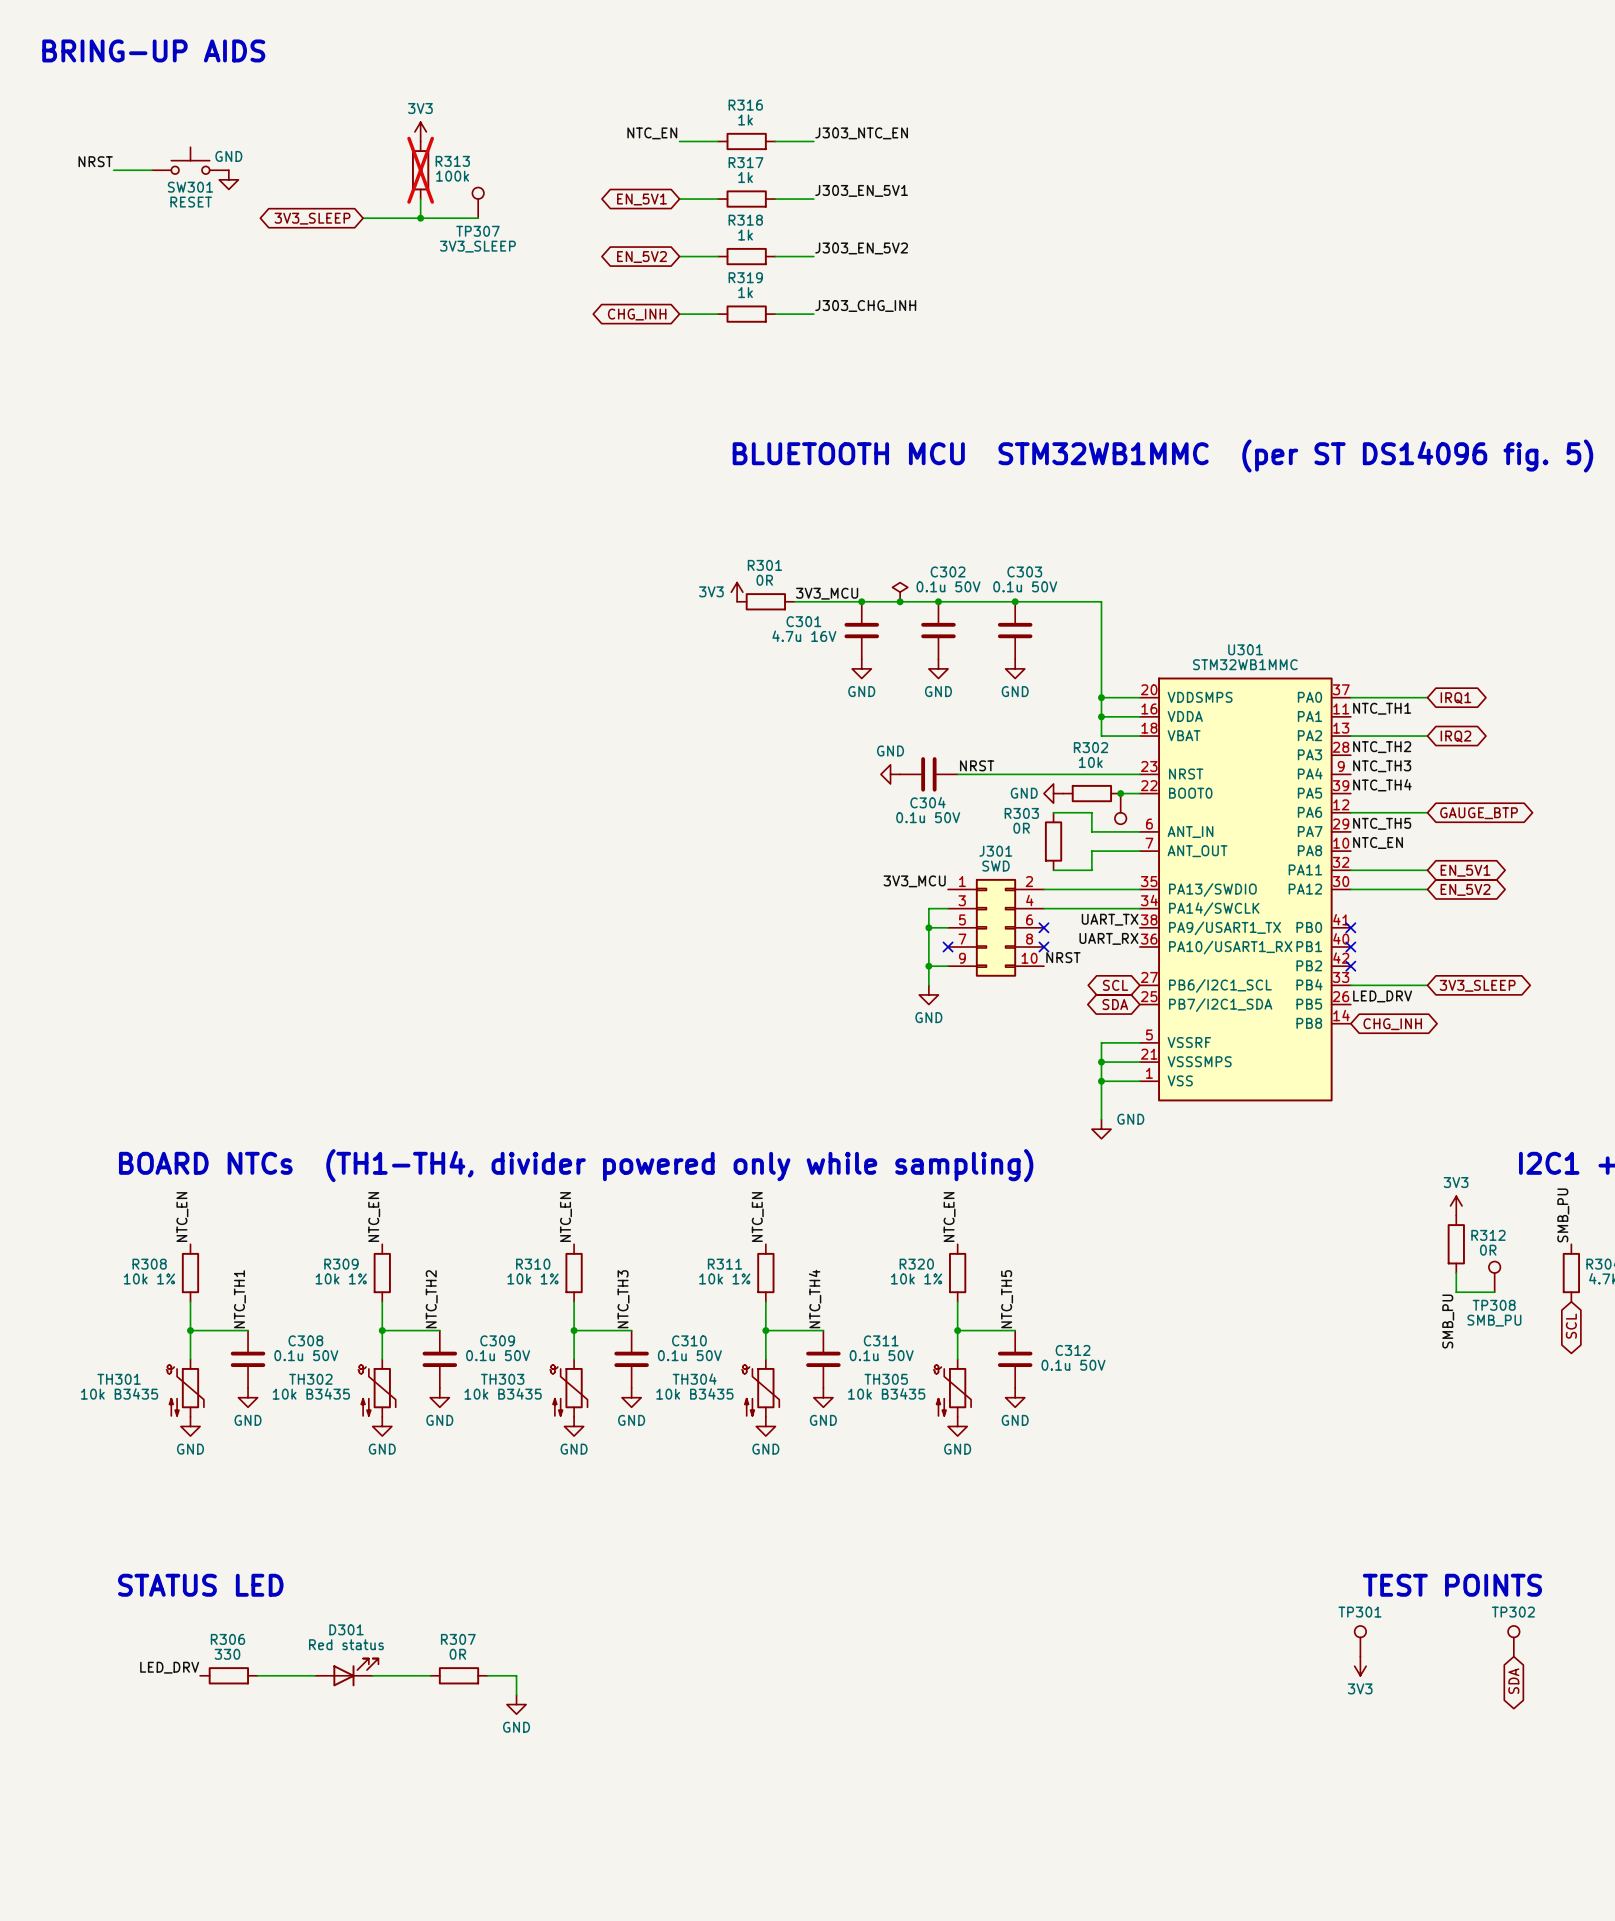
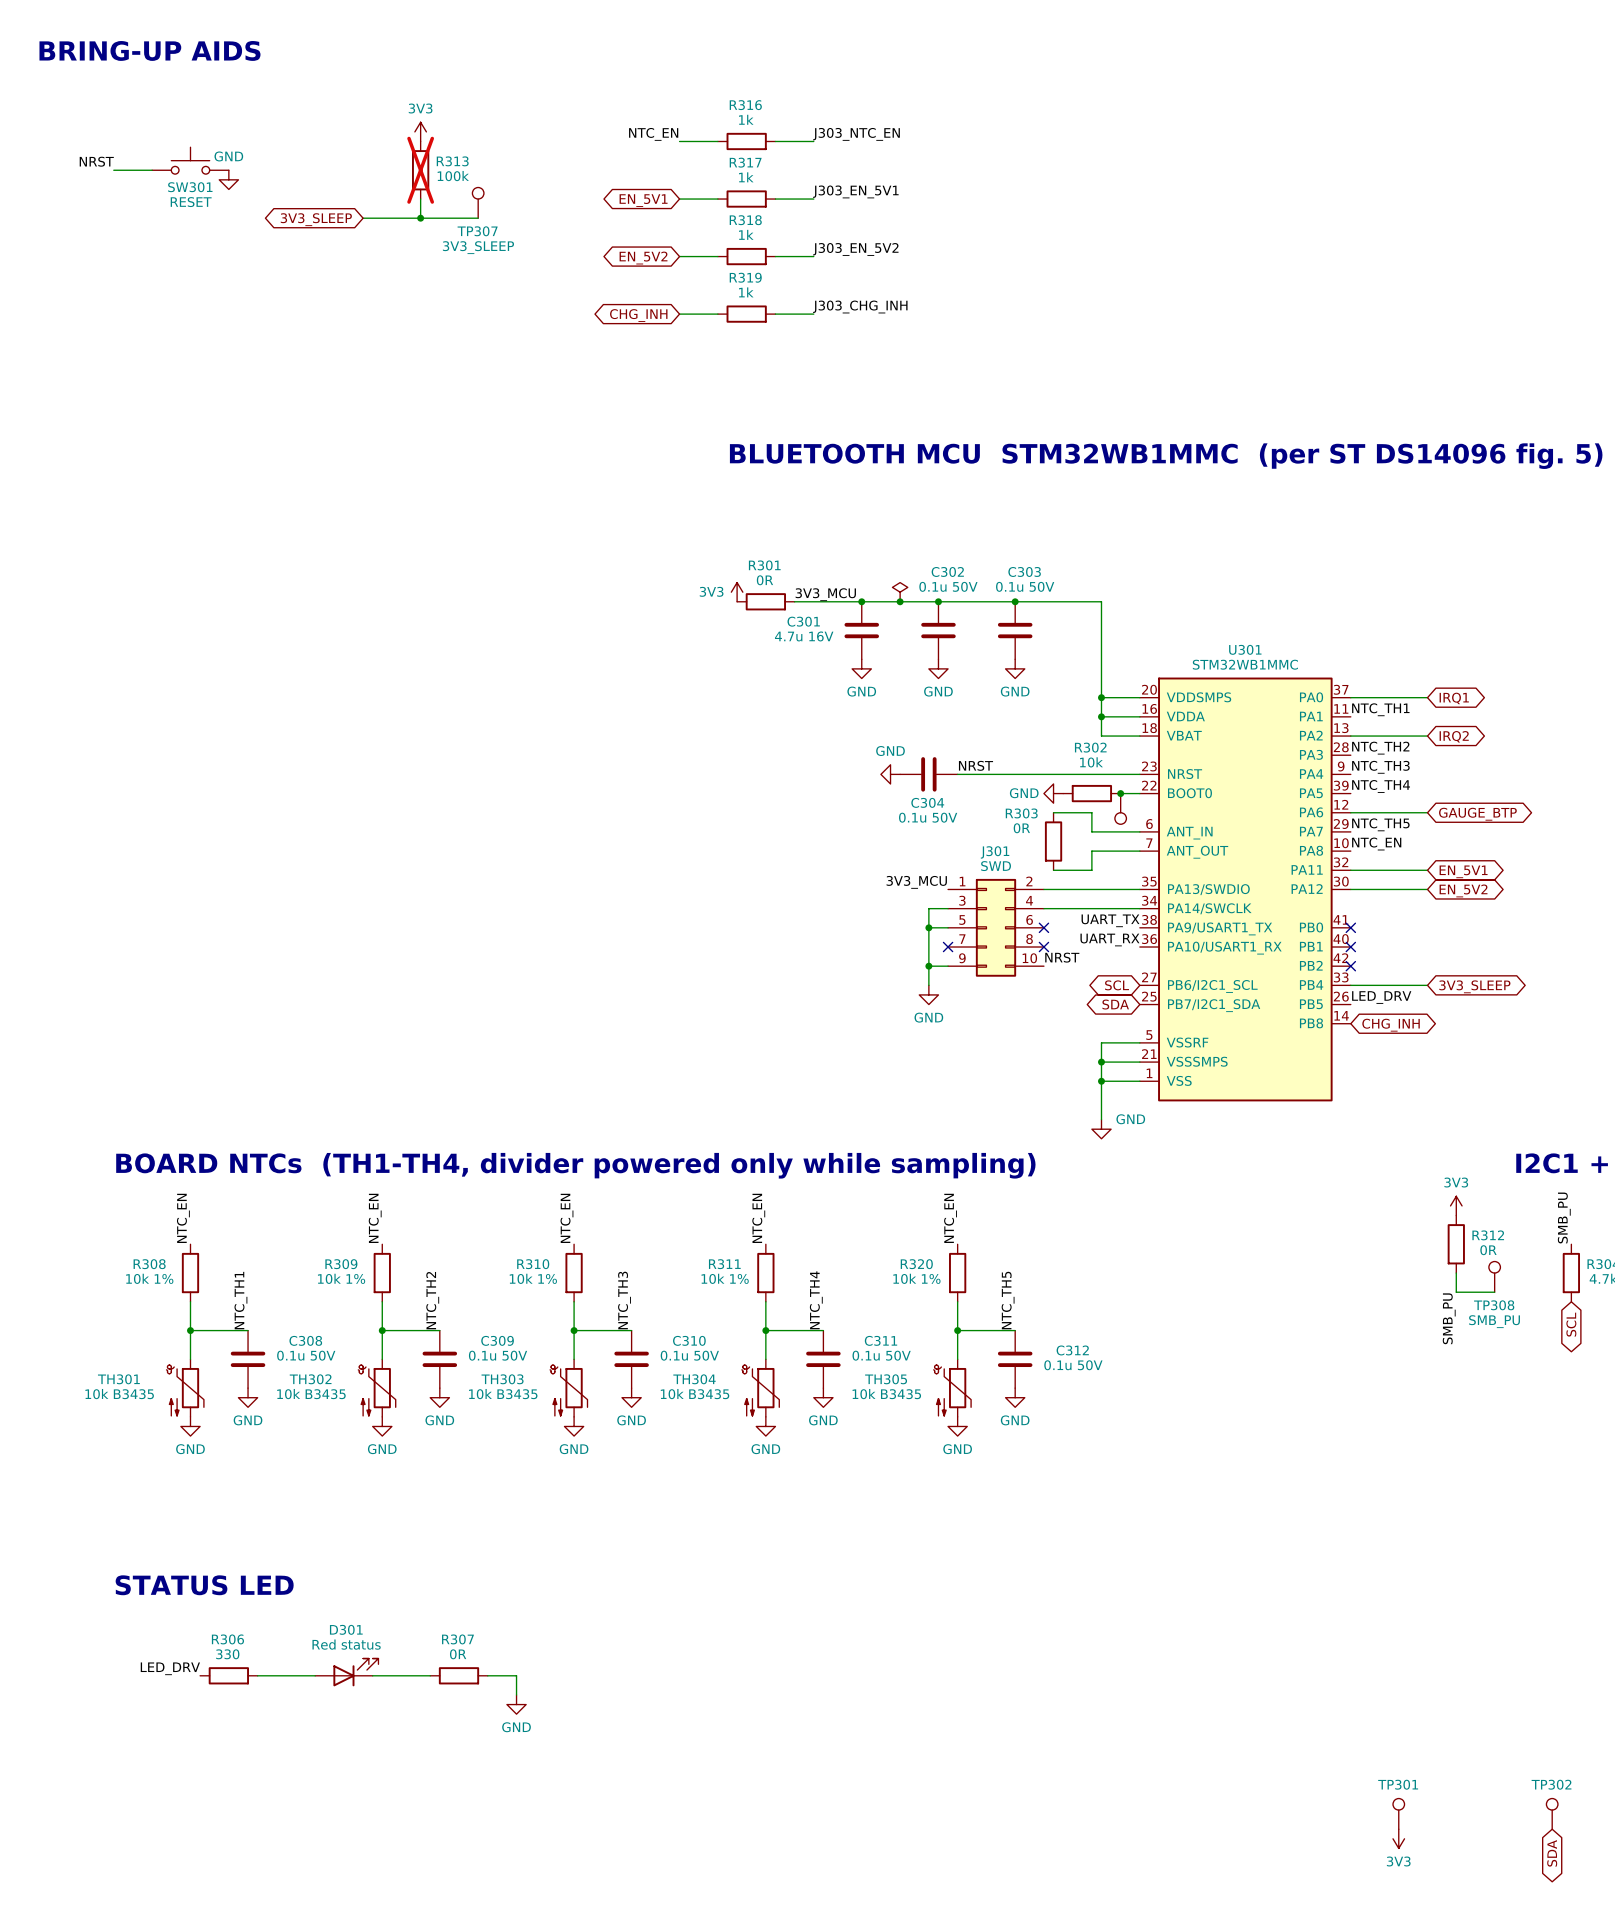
text: TEST POINTS (1452, 1585) -> none
TP301 position: (1360, 1641) -> (1398, 1813)
TP302 position: (1513, 1641) -> (1552, 1813)
power symbol position: 3V3 (1360, 1666) -> 3V3 (1398, 1838)
global label position: SDA (1513, 1681) -> SDA (1552, 1853)

